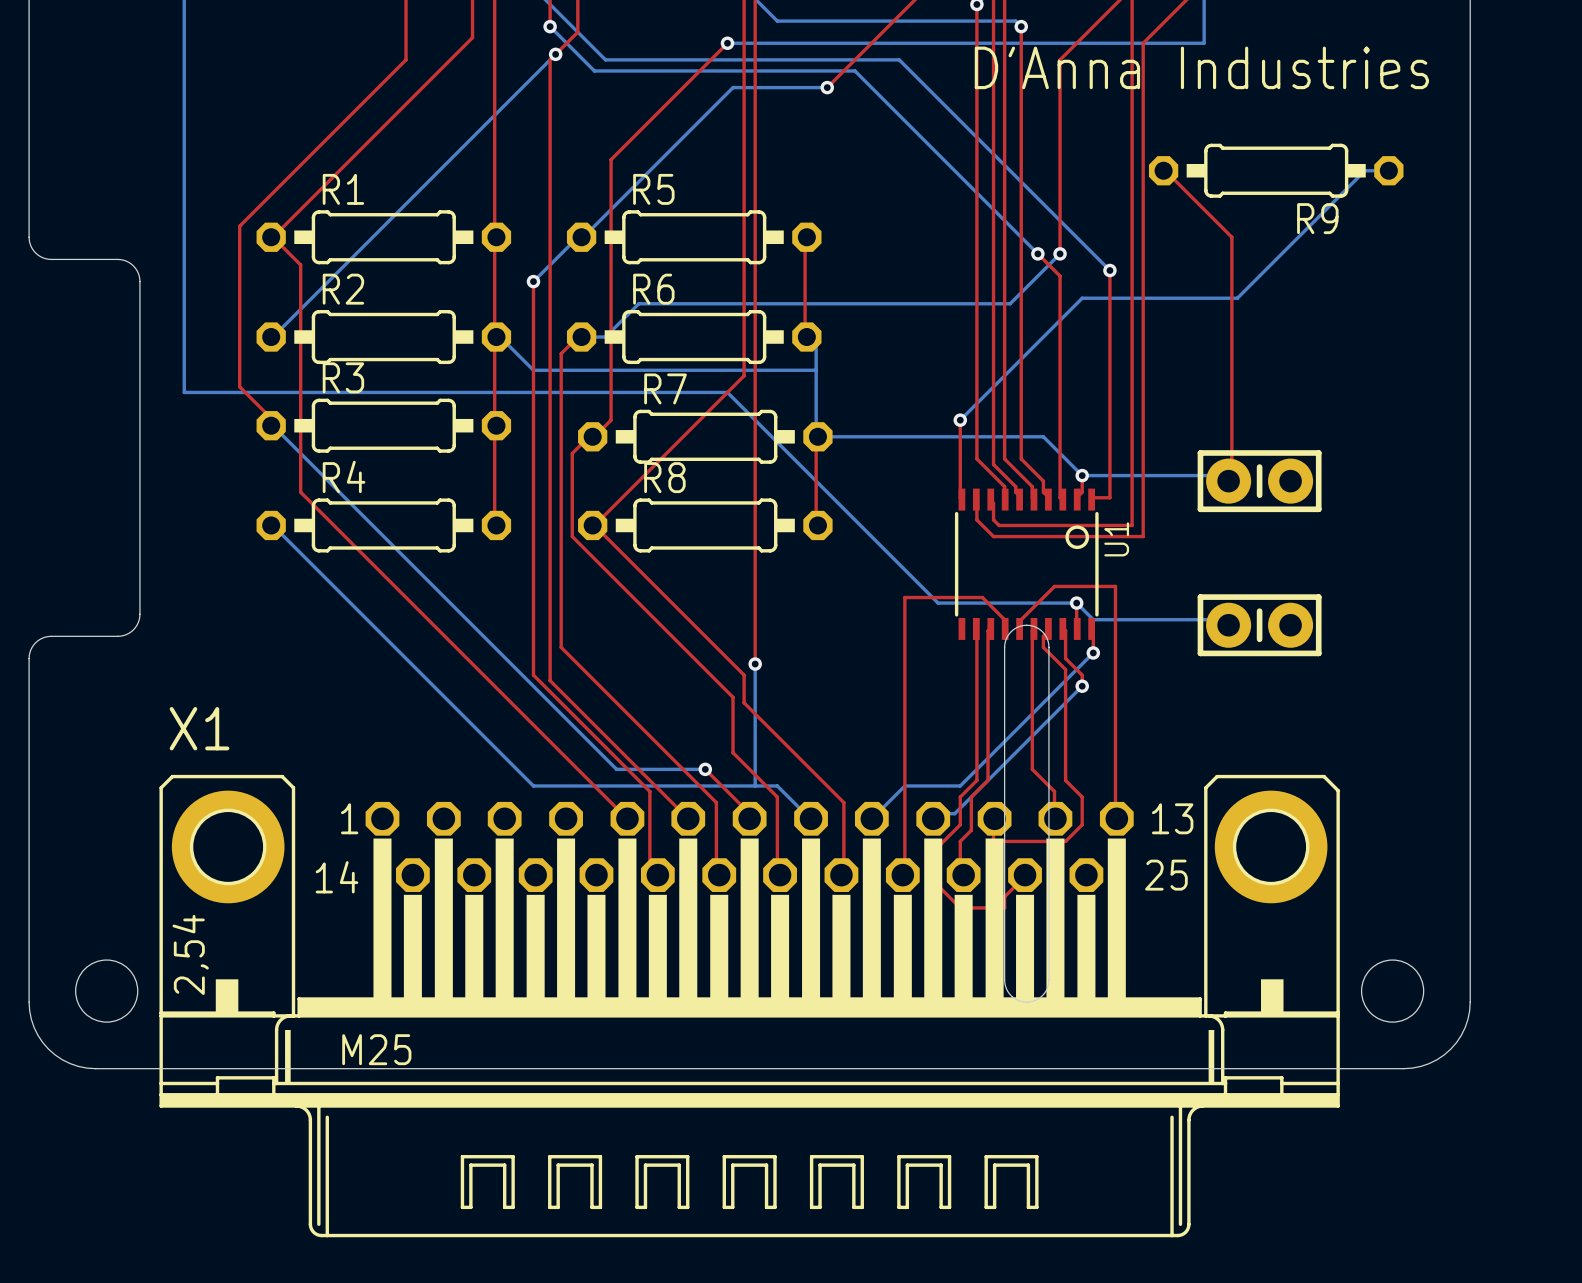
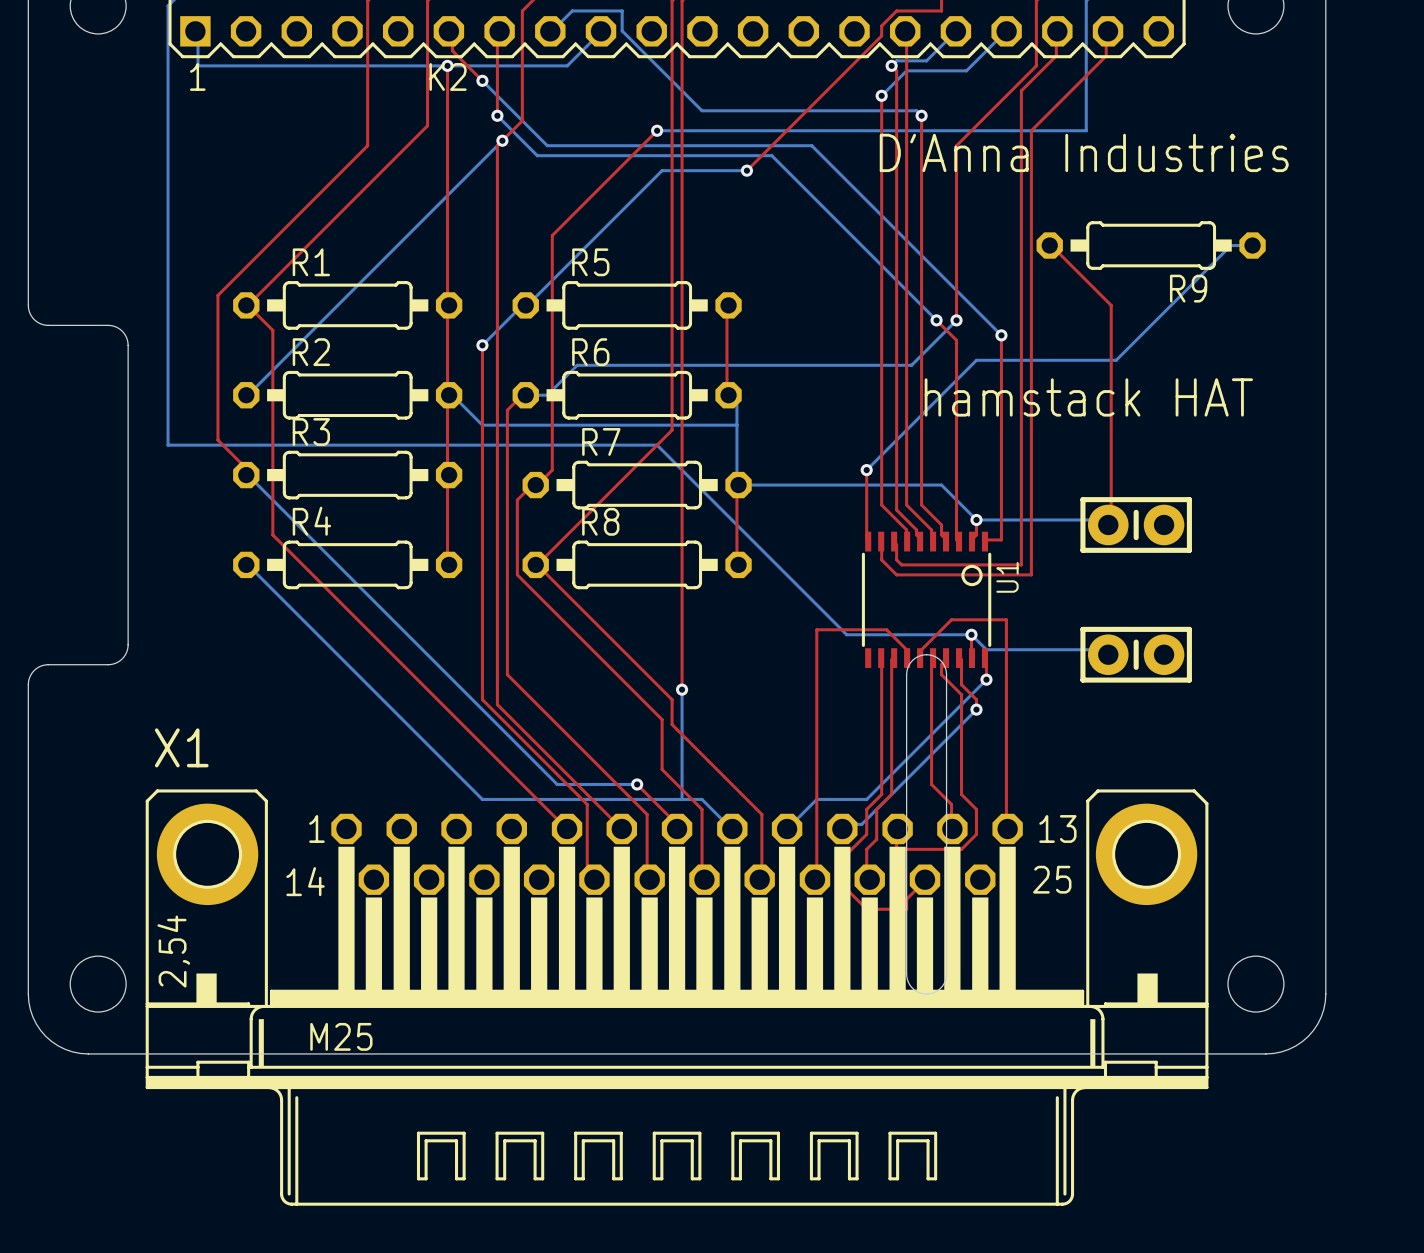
text: none -> hamstack HAT (1088, 397)

